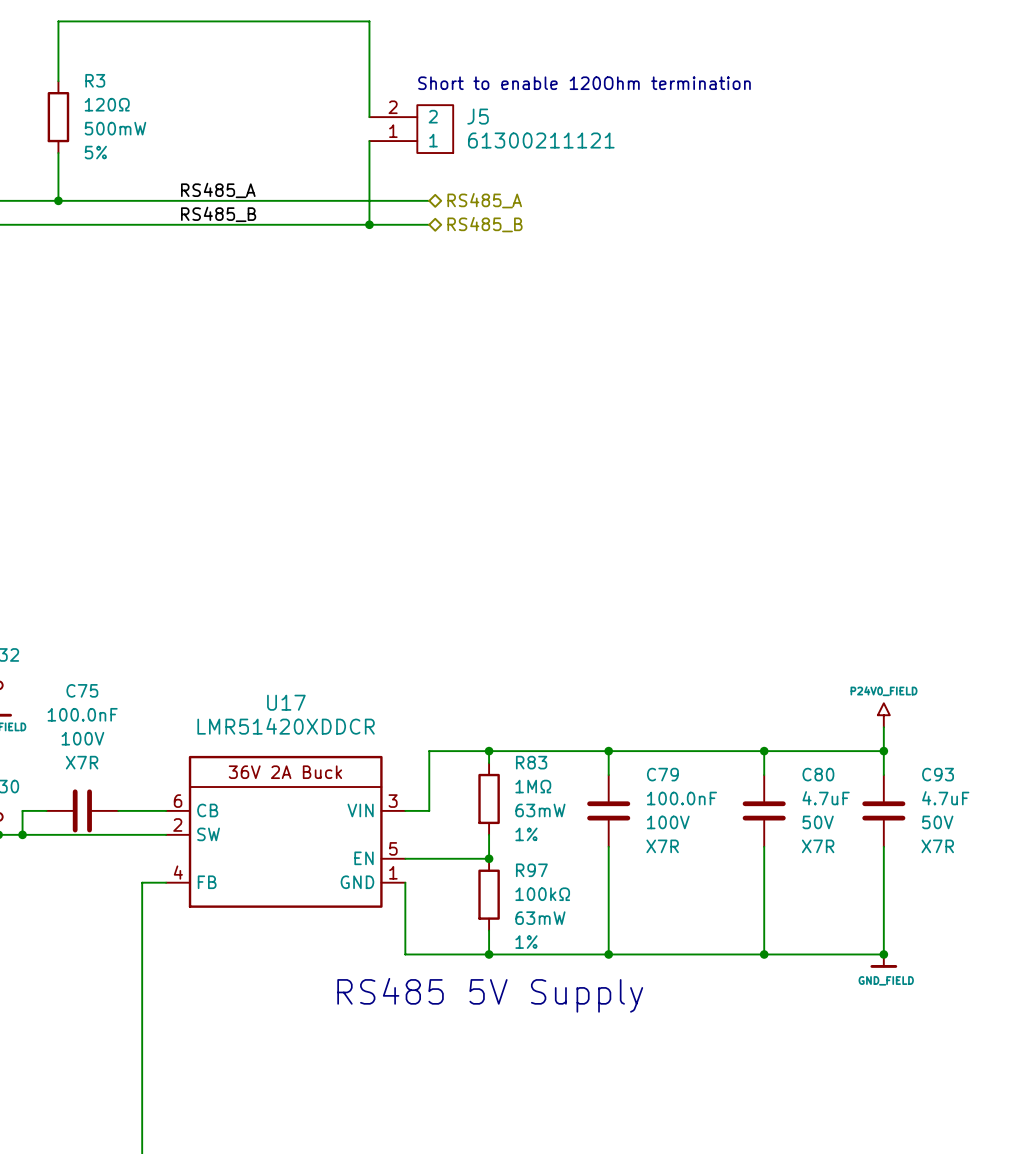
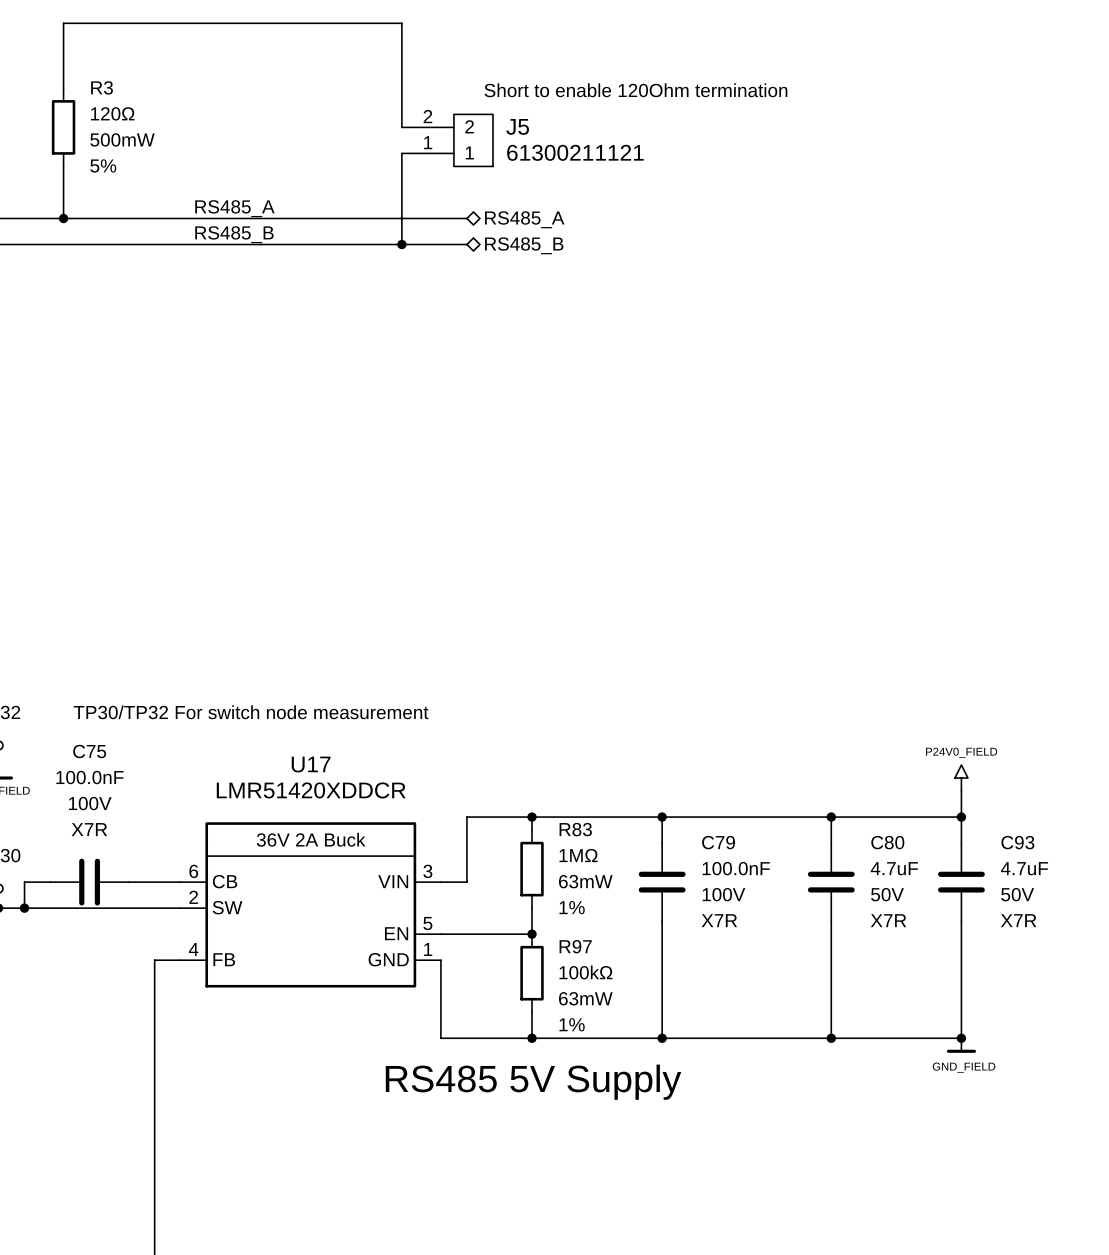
text: none -> TP30/TP32 For switch node measurement (251, 712)

